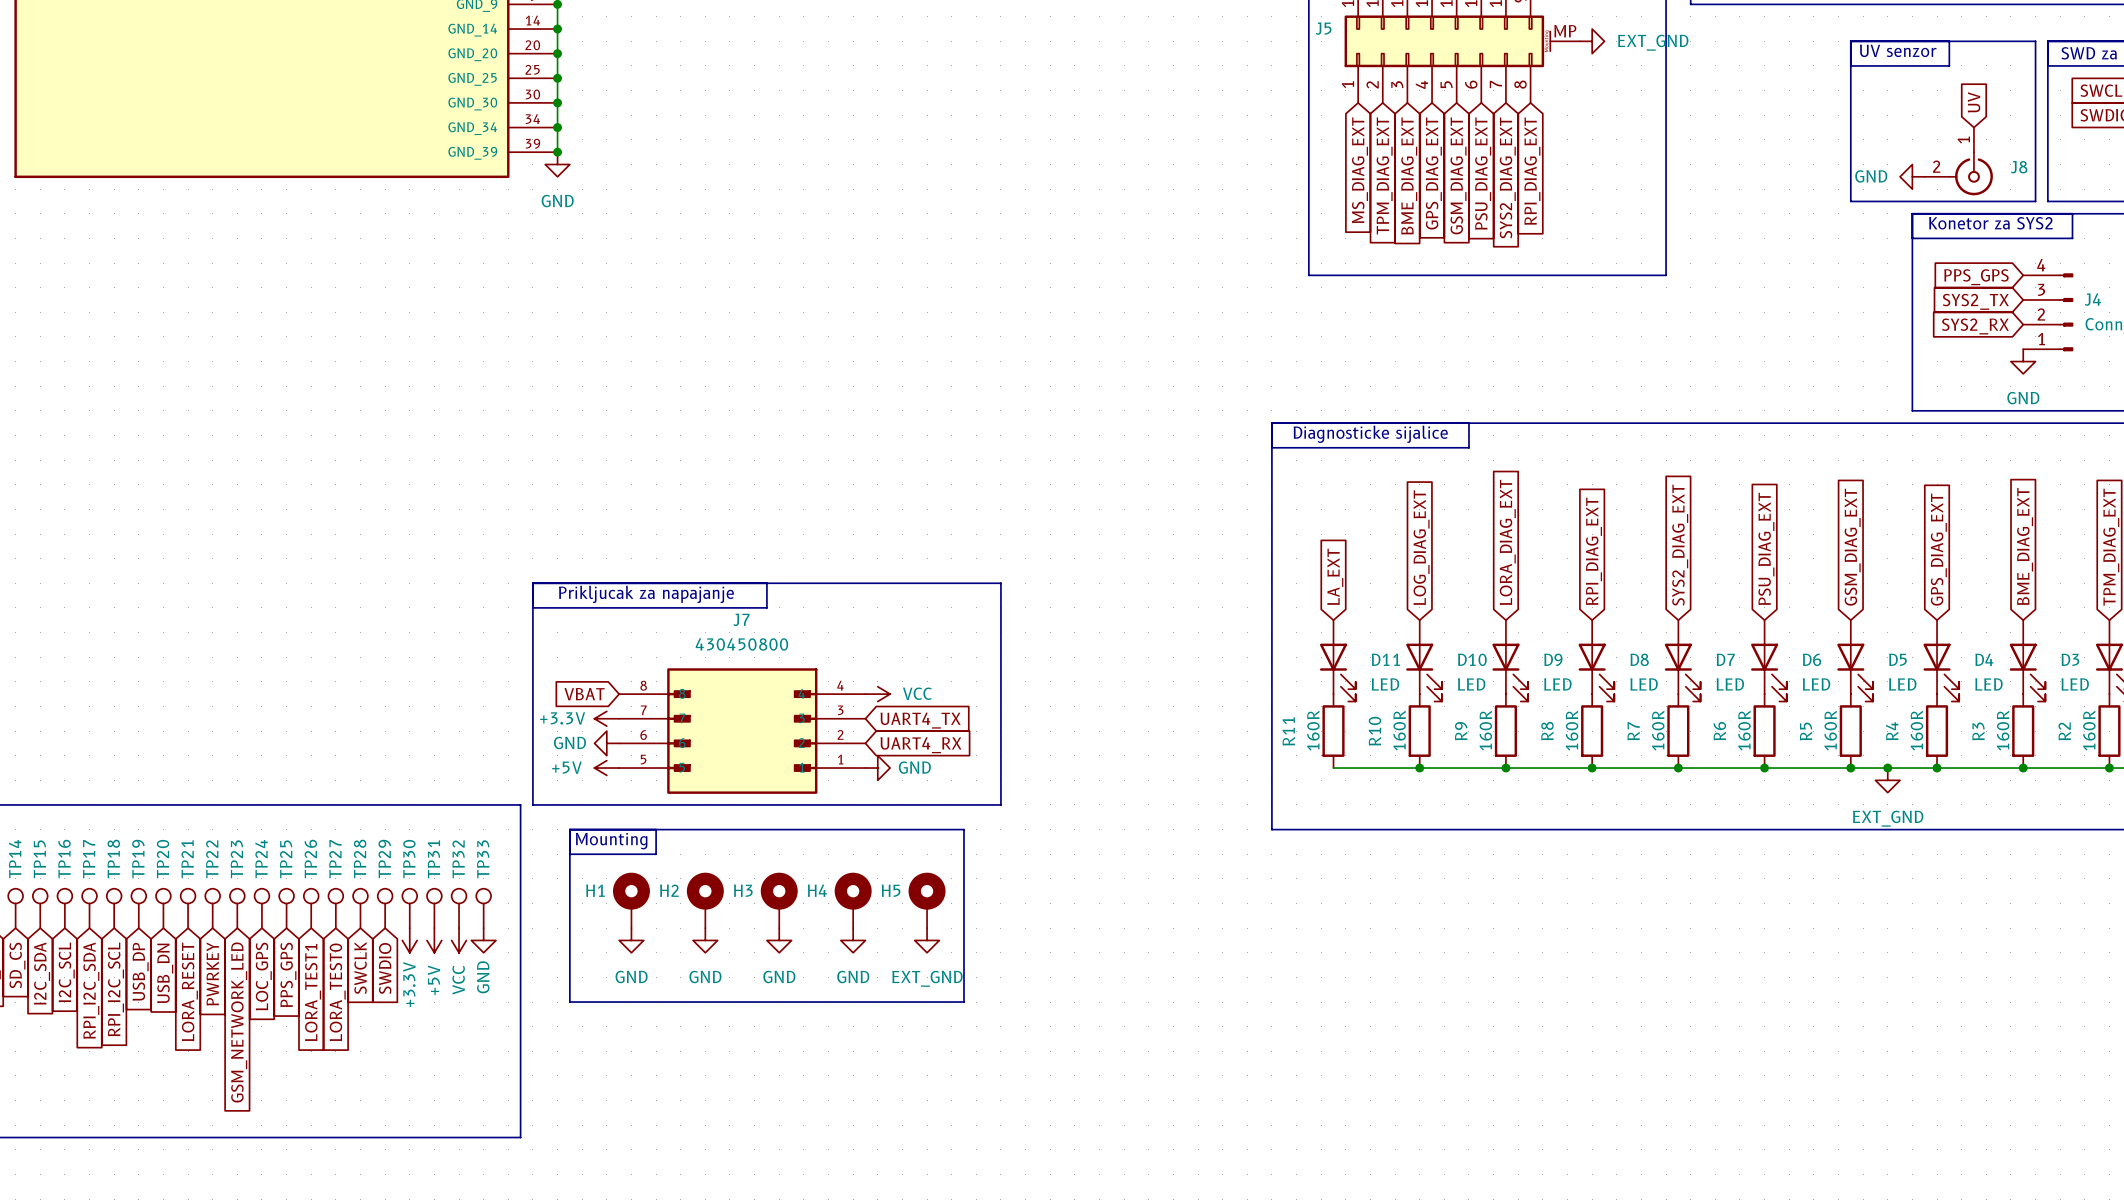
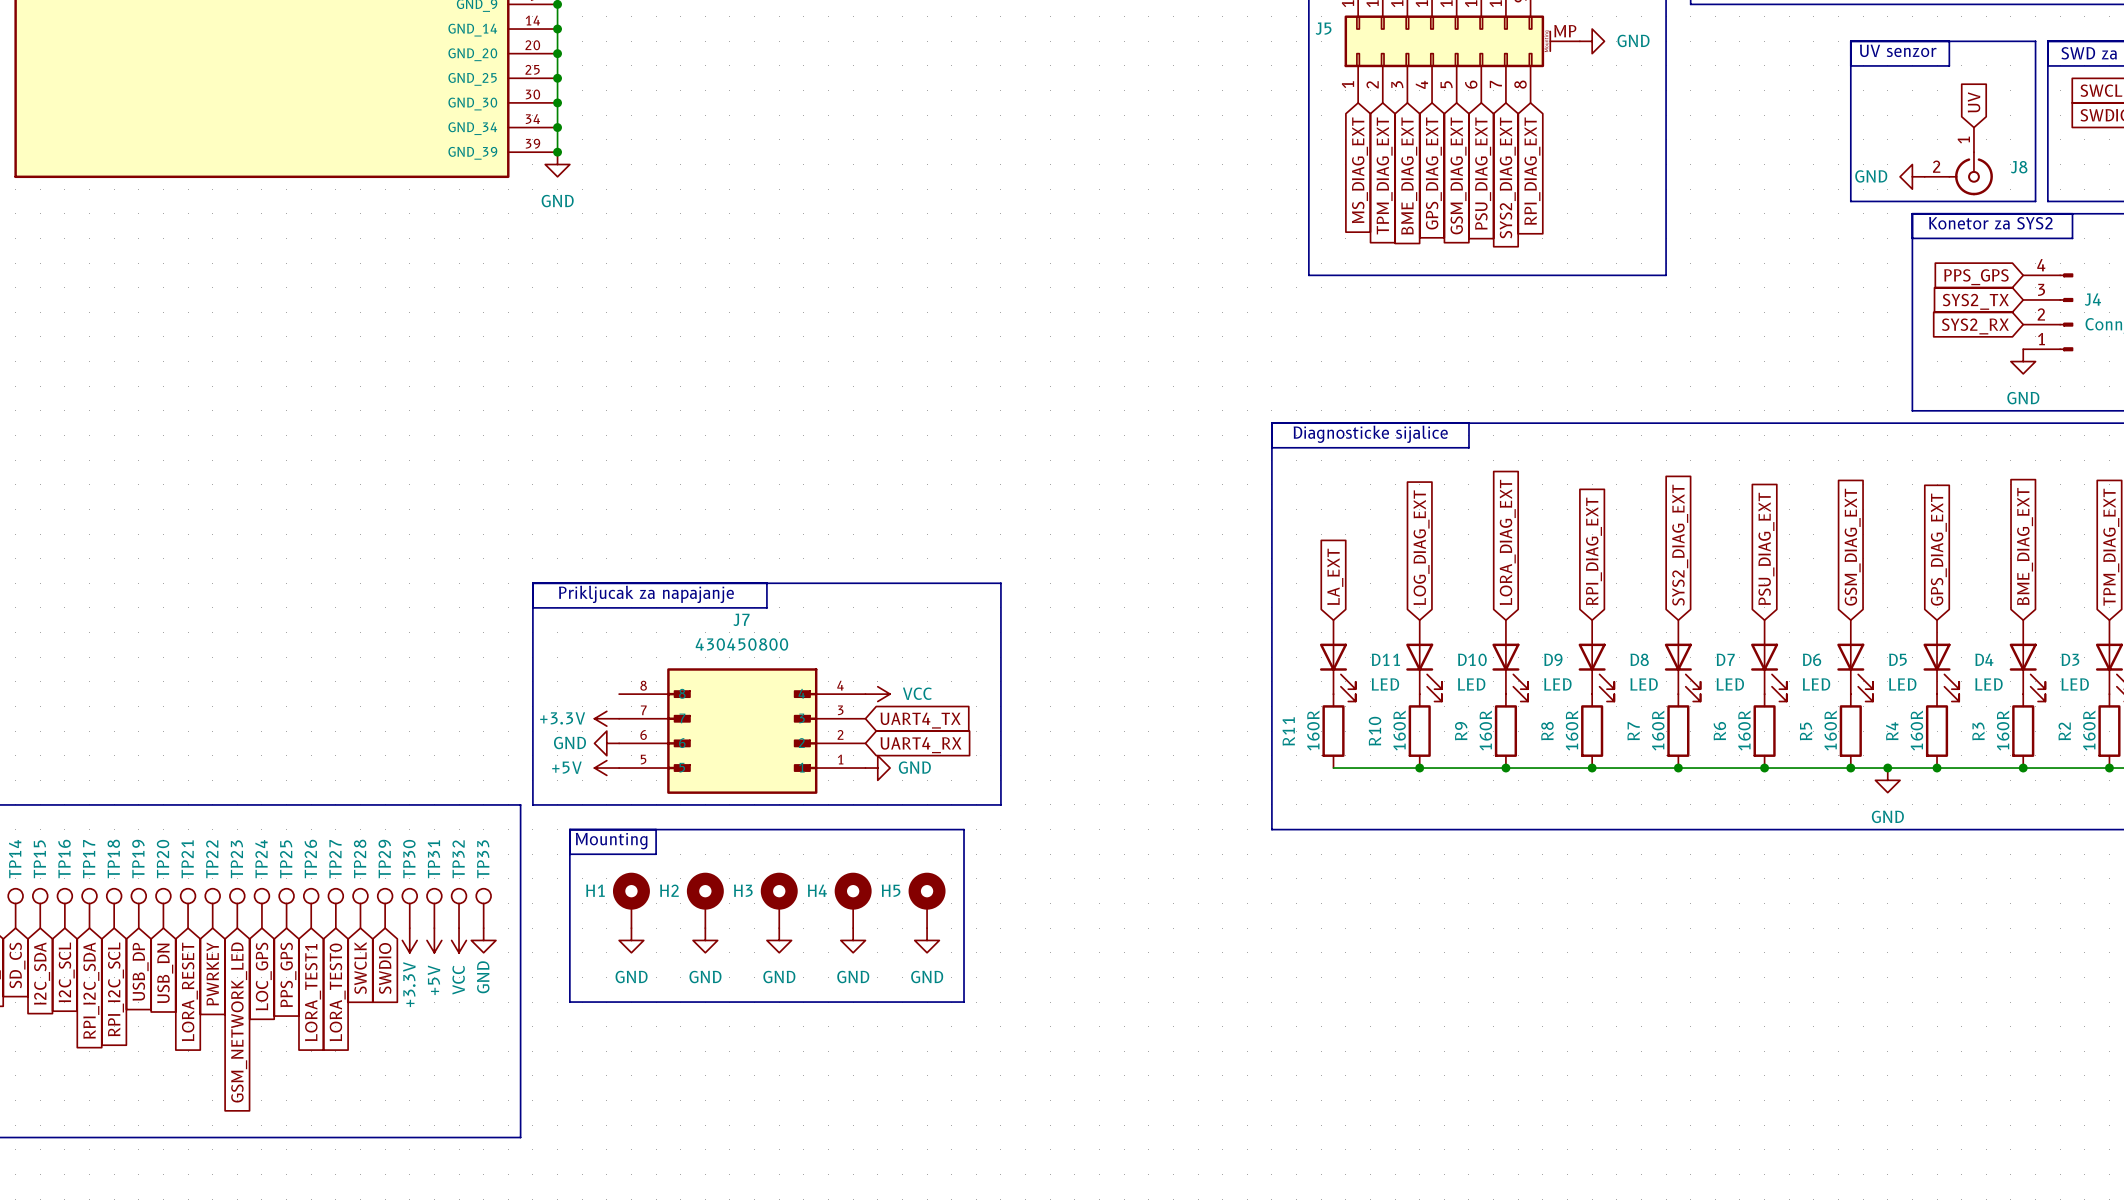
power symbol: EXT_GND (1592, 41) -> GND (1592, 41)
global label: VBAT (584, 694) -> none
power symbol: EXT_GND (1887, 780) -> GND (1887, 780)
power symbol: EXT_GND (927, 940) -> GND (927, 940)

